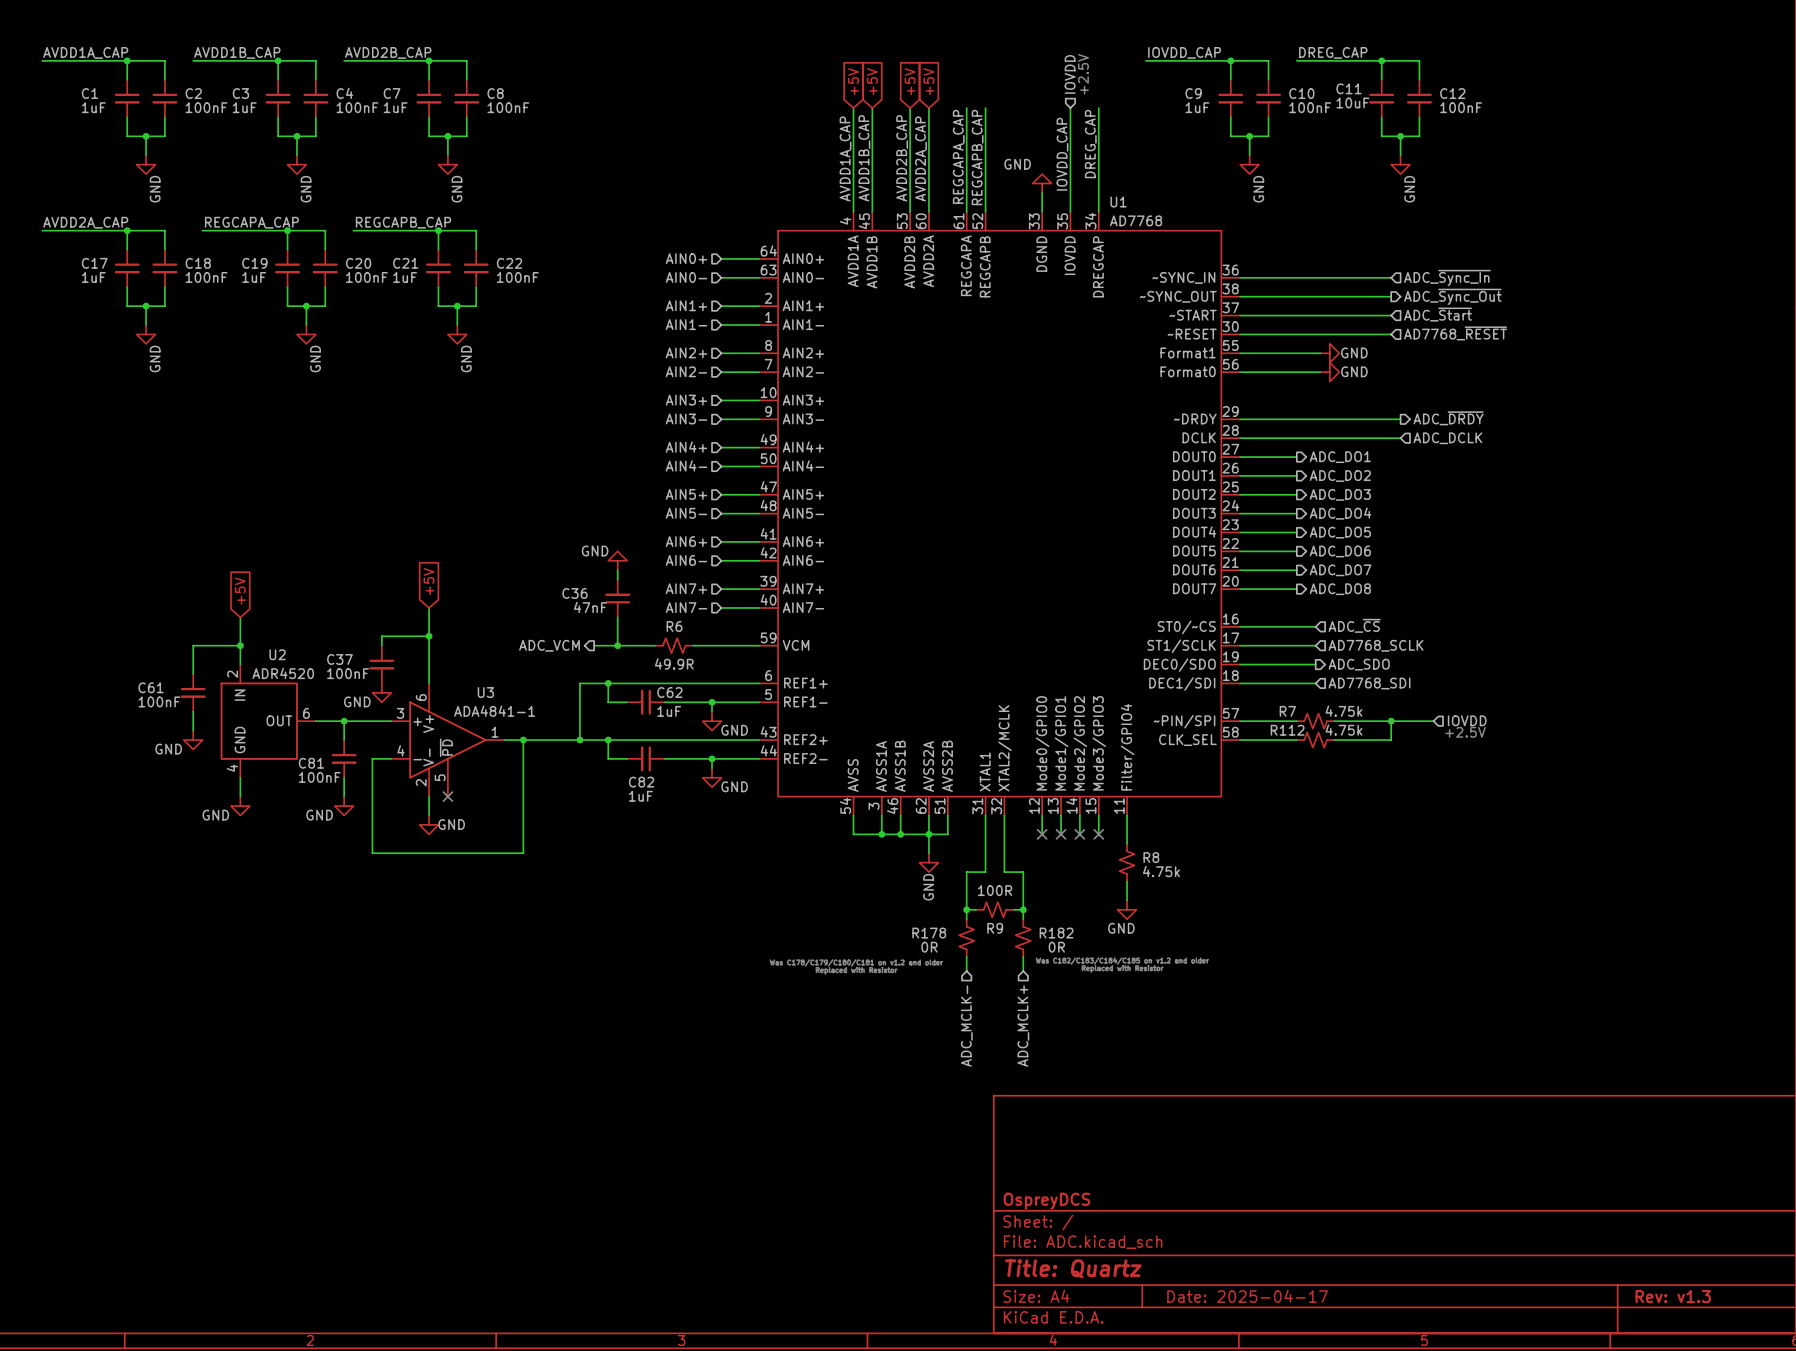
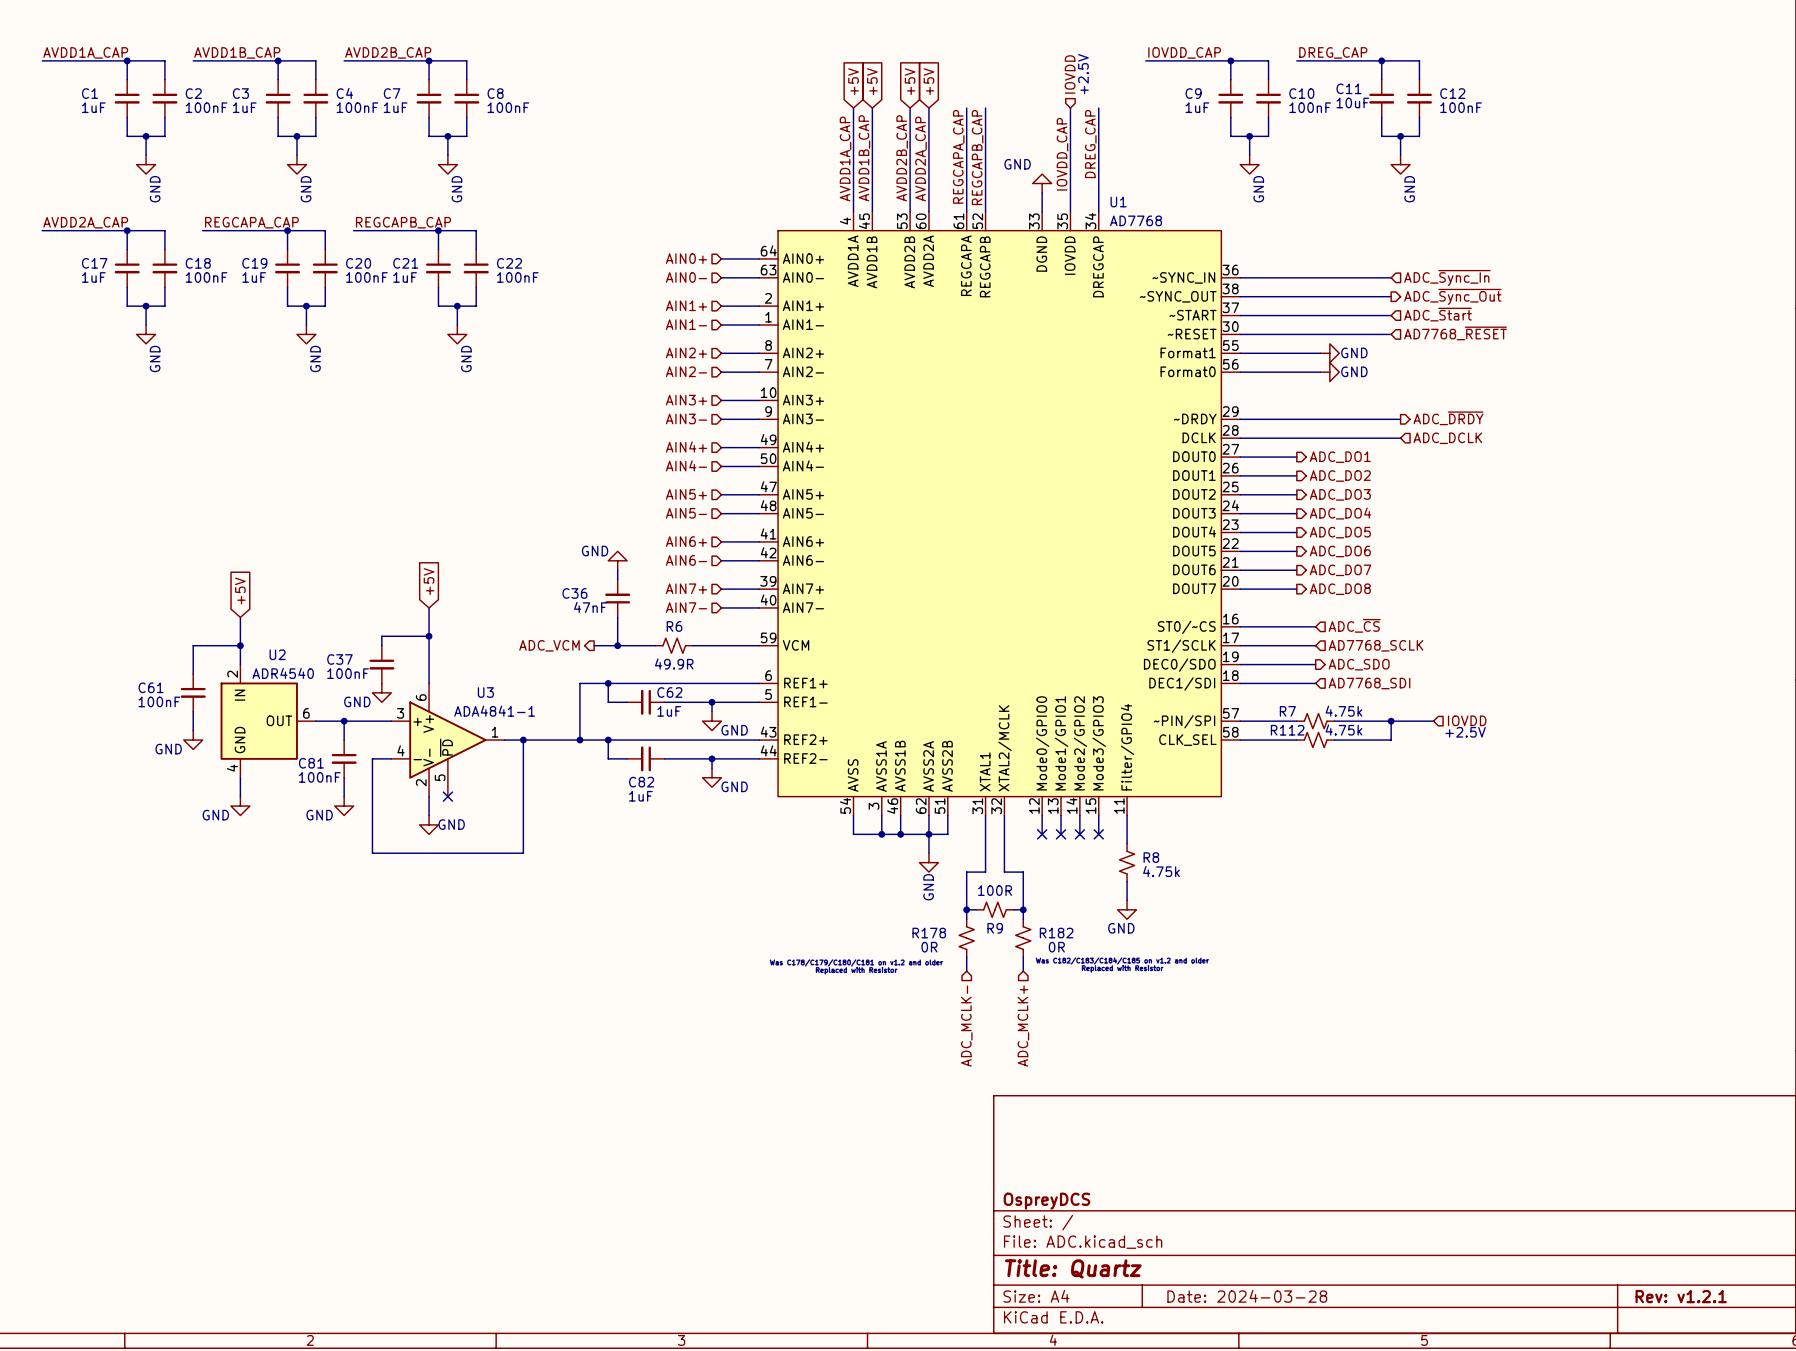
U2 value: ADR4520 (283, 673) -> ADR4540 (283, 673)
title block: Date: 2025-04-17 (1247, 1296) -> Date: 2024-03-28 (1247, 1296)
title block: Rev: v1.3 (1673, 1296) -> Rev: v1.2.1 (1681, 1296)

